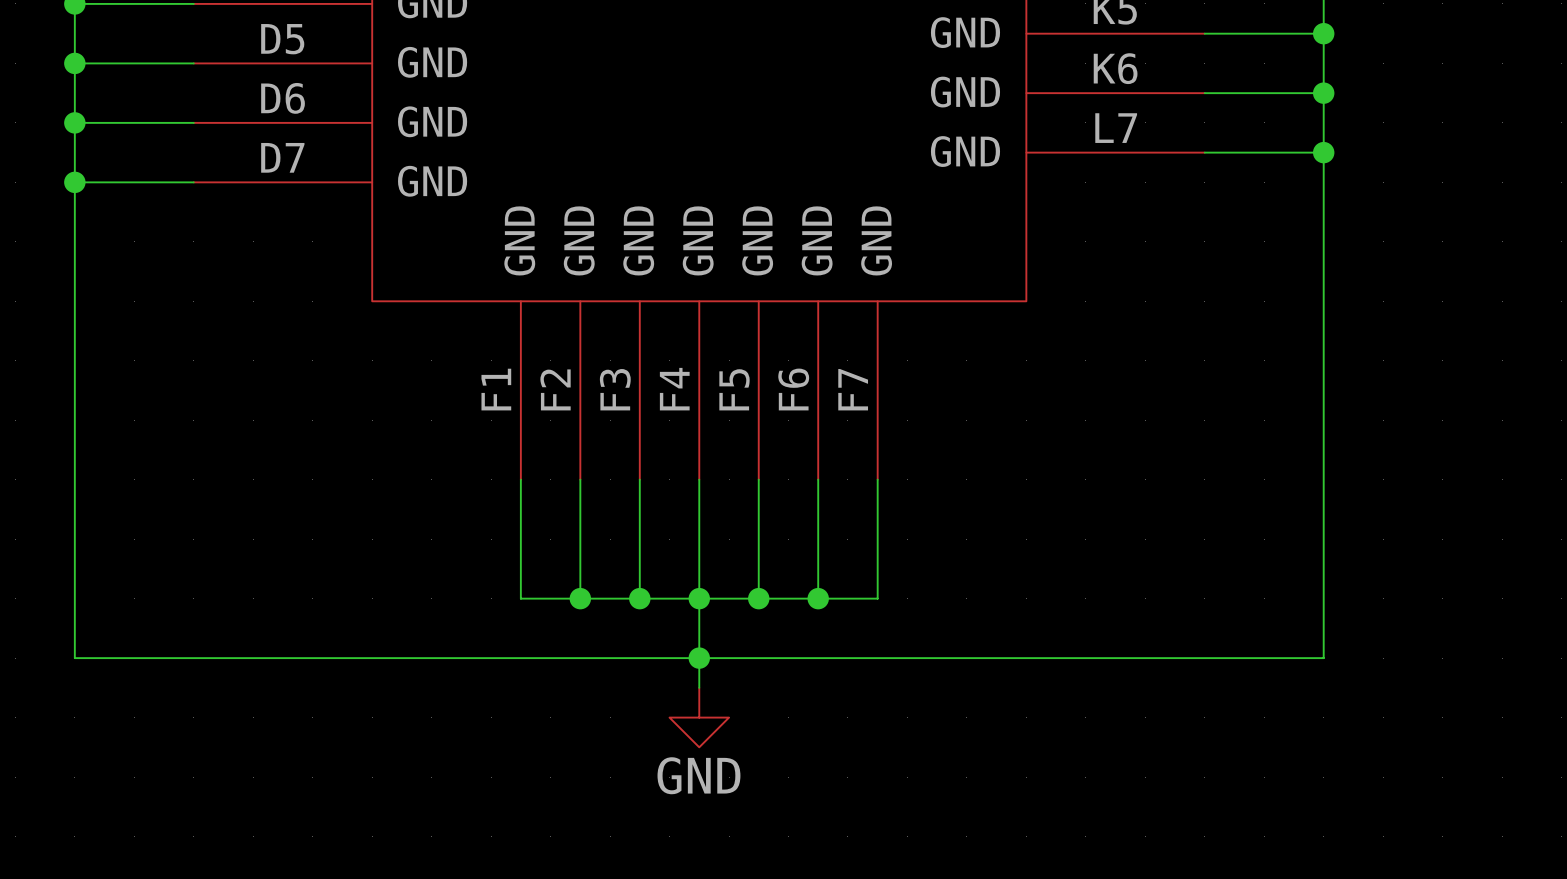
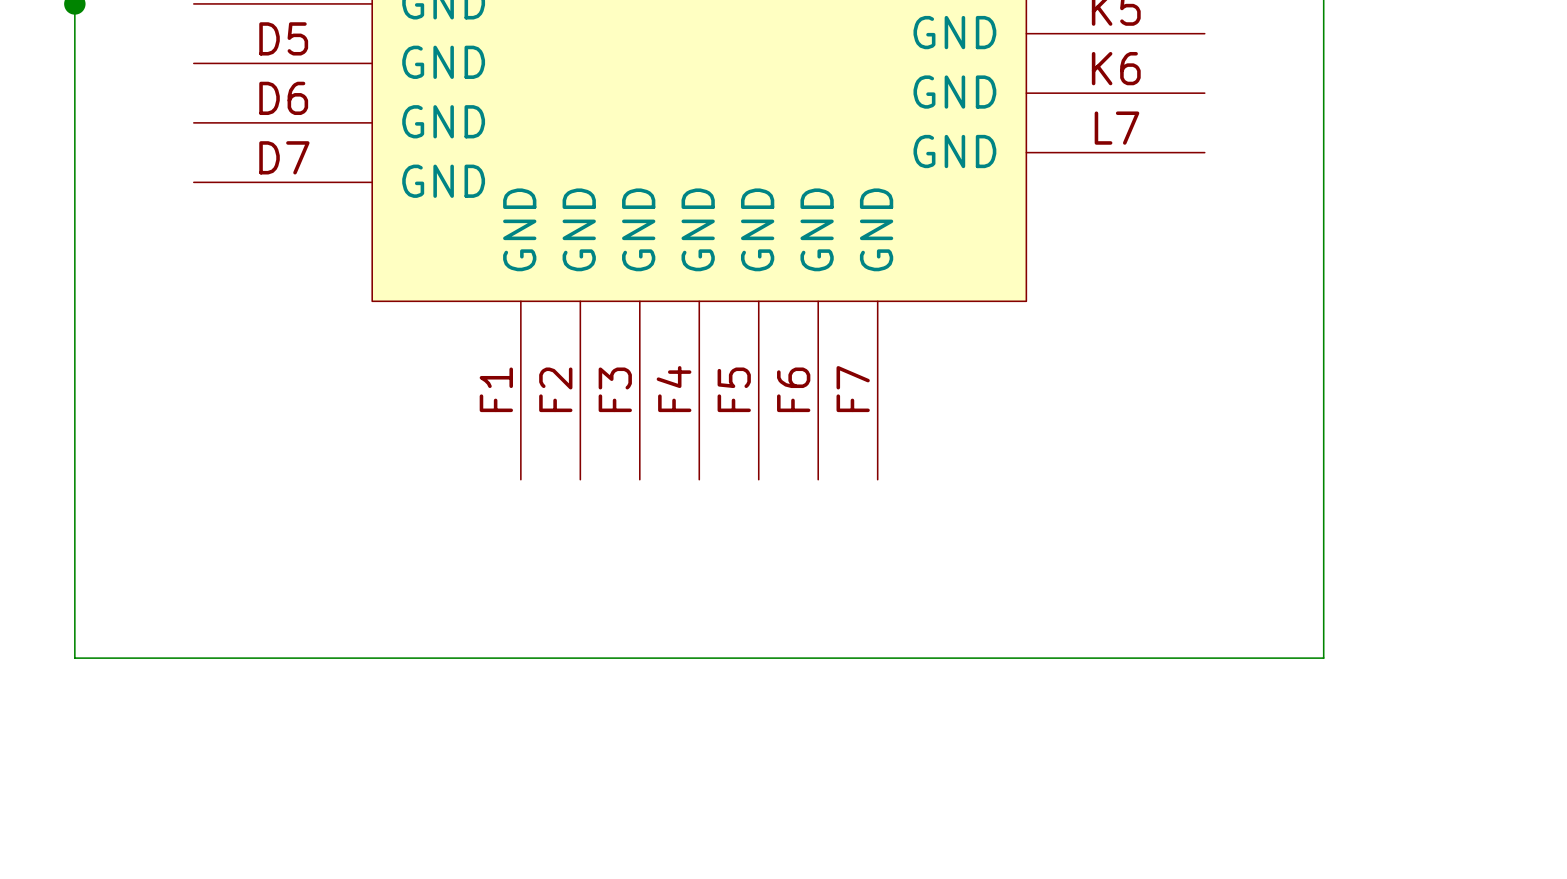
wire: (74, 3) (193, 3) -> none
wire: (1204, 33) (1323, 33) -> none
junction: (1323, 33) -> none
wire: (74, 63) (193, 63) -> none
junction: (74, 63) -> none
wire: (1204, 93) (1323, 93) -> none
junction: (1323, 93) -> none
wire: (74, 122) (193, 122) -> none
junction: (74, 122) -> none
wire: (1204, 152) (1323, 152) -> none
junction: (1323, 152) -> none
wire: (74, 182) (193, 182) -> none
junction: (74, 182) -> none
wire: (520, 479) (520, 598) (877, 598) (877, 479) -> none
wire: (580, 479) (580, 598) -> none
wire: (639, 479) (639, 598) -> none
wire: (699, 479) (699, 687) -> none
wire: (758, 479) (758, 598) -> none
wire: (818, 479) (818, 598) -> none
junction: (580, 598) -> none
junction: (639, 598) -> none
junction: (699, 598) -> none
junction: (758, 598) -> none
junction: (818, 598) -> none
junction: (699, 658) -> none
power symbol: GND (699, 717) -> none

